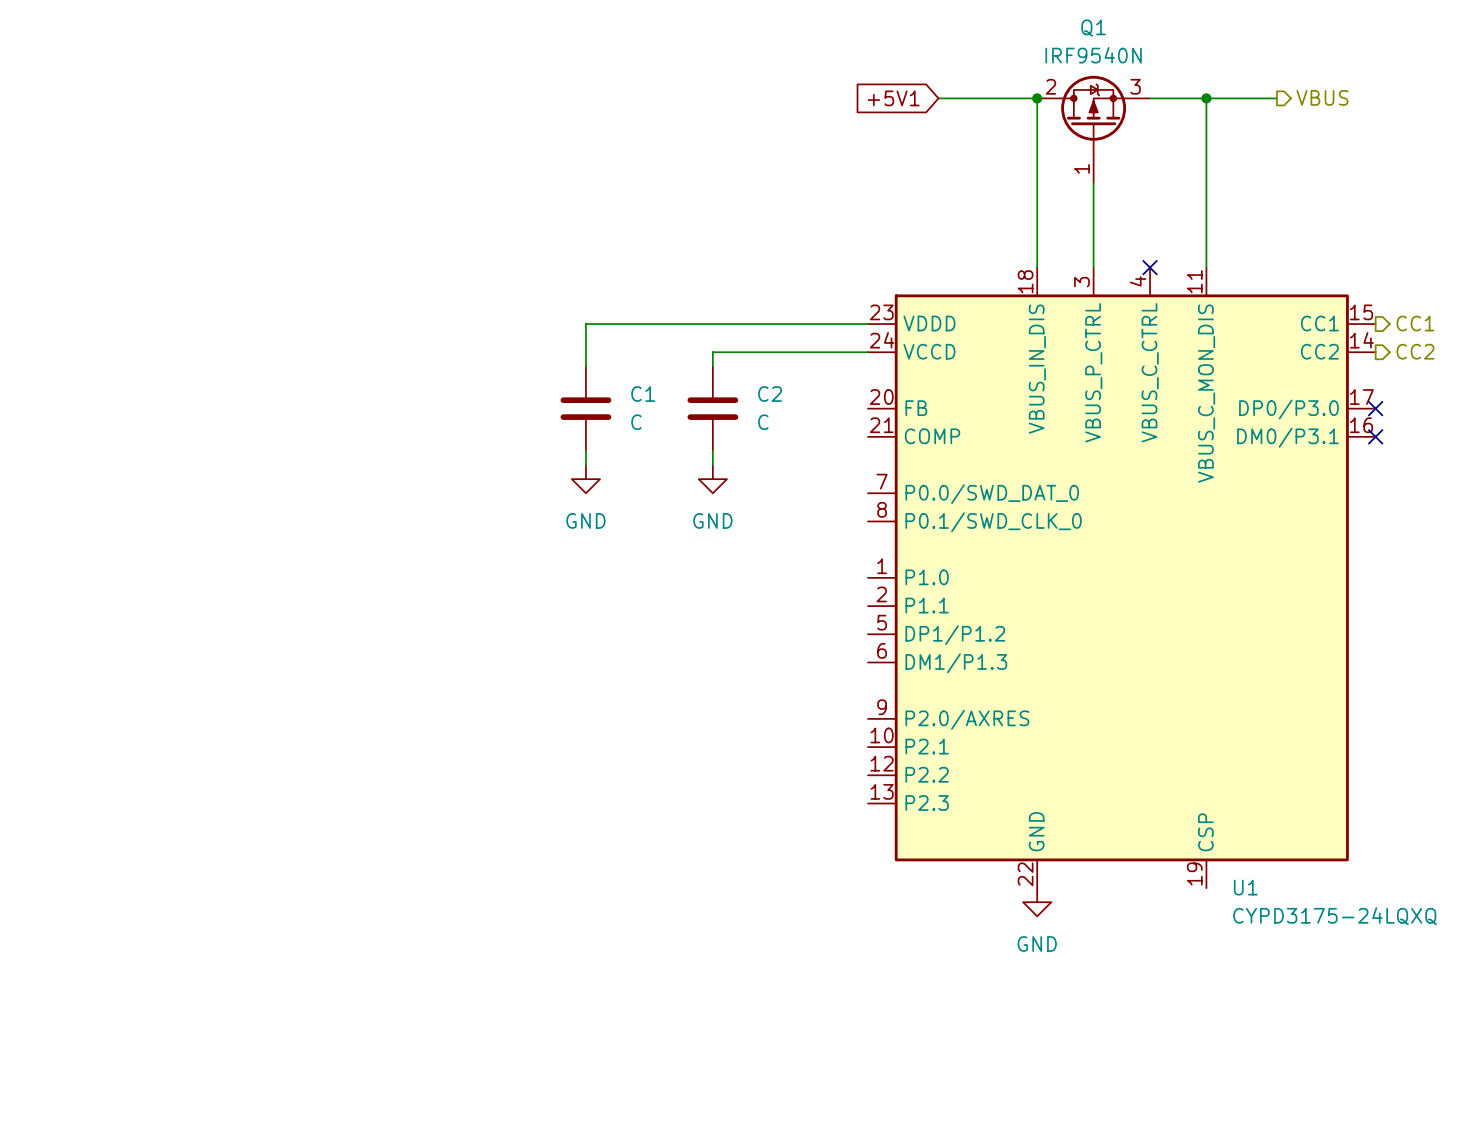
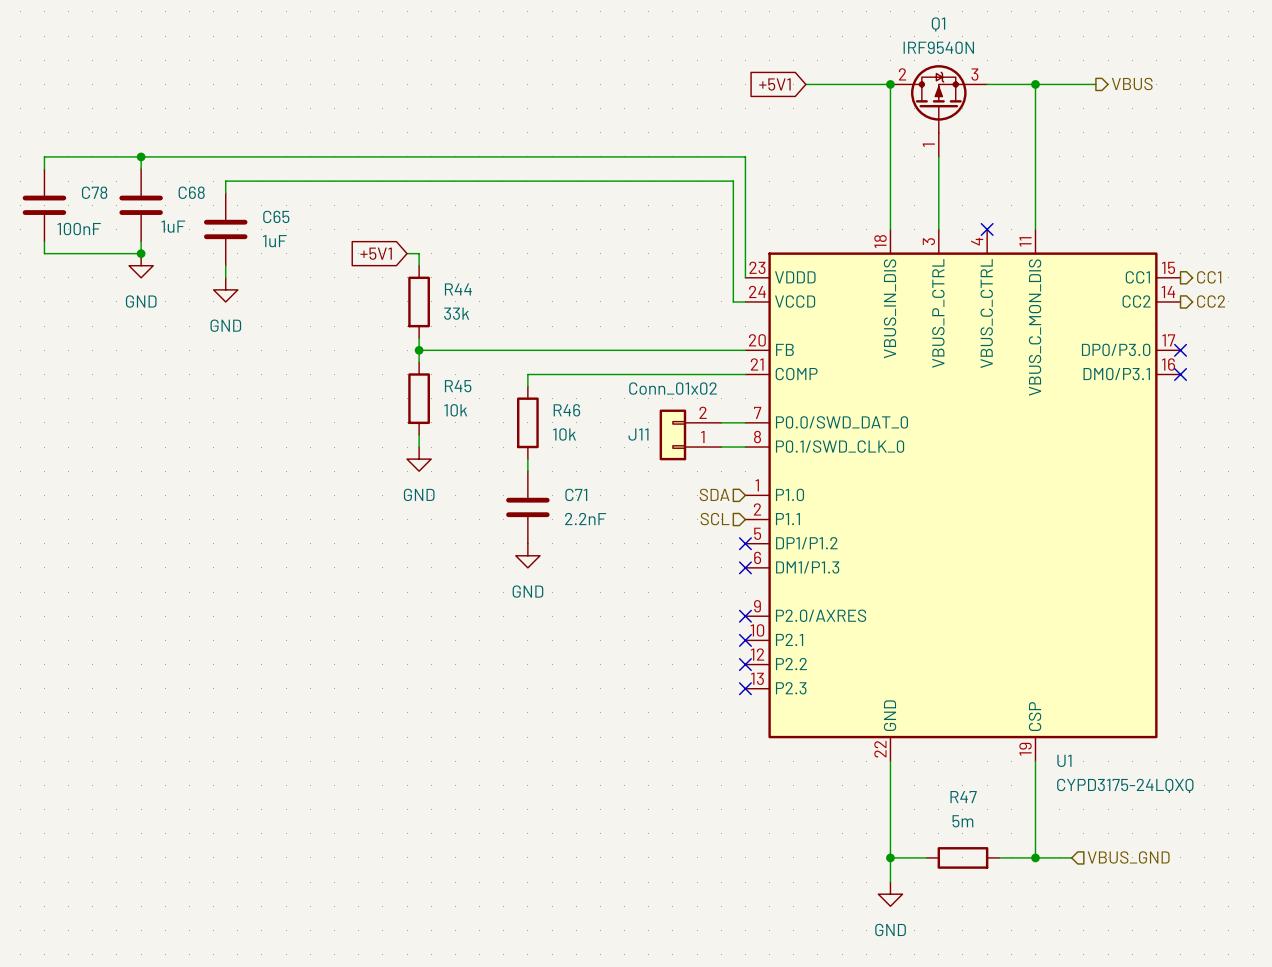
wire: none -> (141, 156) (141, 169)
junction: none -> (141, 156)
C78: none -> 100nF (44, 205)
C68: none -> 1uF (141, 205)
C65: none -> 1uF (225, 229)
wire: none -> (44, 241) (44, 253) (141, 253) (141, 241)
junction: none -> (141, 253)
global label: none -> +5V1 (376, 253)
wire: none -> (407, 253) (419, 253) (419, 265)
power symbol: none -> GND (141, 265)
wire: none -> (225, 265) (225, 277)
wire: (867, 324) (585, 324) (585, 366) -> (745, 277) (745, 156) (44, 156) (44, 169)
power symbol: none -> GND (225, 289)
R44: none -> 33k (419, 301)
wire: (853, 352) (712, 352) (712, 366) -> (733, 301) (733, 181) (225, 181) (225, 193)
wire: none -> (419, 338) (419, 362)
wire: none -> (419, 350) (745, 350)
junction: none -> (419, 350)
C1: C (585, 408) -> none
C2: C (712, 408) -> none
wire: none -> (745, 374) (527, 374) (527, 386)
wire: (585, 450) (585, 465) -> (527, 459) (527, 471)
wire: (712, 450) (712, 465) -> (419, 434) (419, 447)
R45: none -> 10k (419, 398)
power symbol: GND (585, 479) -> none
power symbol: GND (712, 479) -> none
R46: none -> 10k (527, 422)
wire: none -> (721, 422) (745, 422)
J11: none -> Conn_01x02 (690, 434)
wire: none -> (721, 447) (745, 447)
power symbol: none -> GND (419, 459)
hierarchical label: none -> SDA (714, 494)
C71: none -> 2.2nF (527, 507)
hierarchical label: none -> SCL (715, 519)
no-connect mark: none -> (745, 543)
power symbol: none -> GND (527, 555)
no-connect mark: none -> (745, 567)
no-connect mark: none -> (745, 616)
no-connect mark: none -> (745, 640)
no-connect mark: none -> (745, 664)
no-connect mark: none -> (745, 688)
wire: none -> (890, 761) (890, 882)
wire: none -> (1035, 761) (1035, 857)
power symbol position: GND (1037, 902) -> GND (890, 894)
wire: none -> (890, 857) (926, 857)
junction: none -> (890, 857)
R47: none -> 5m (962, 857)
wire: none -> (999, 857) (1071, 857)
junction: none -> (1035, 857)
hierarchical label: none -> VBUS_GND (1128, 857)

